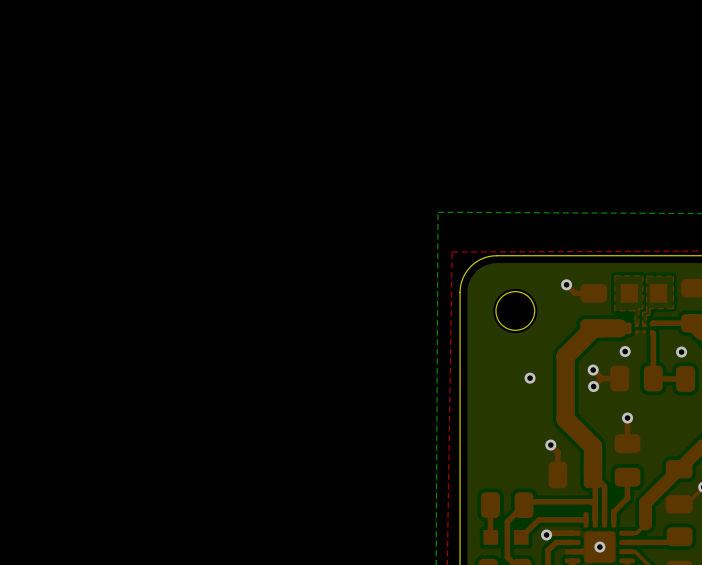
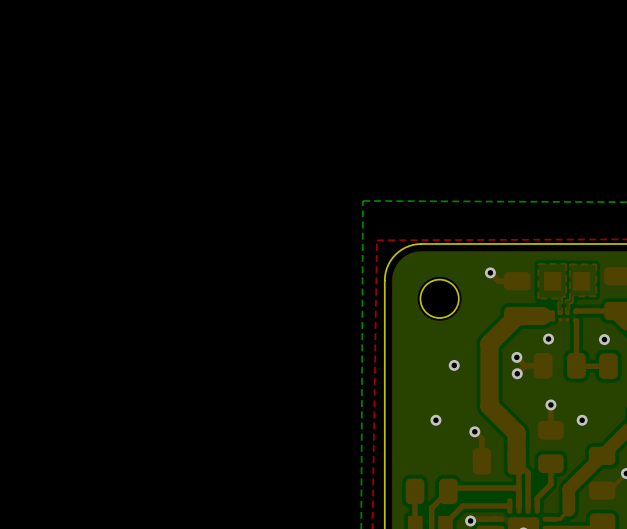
via: none -> (435, 420)
via: none -> (582, 420)

